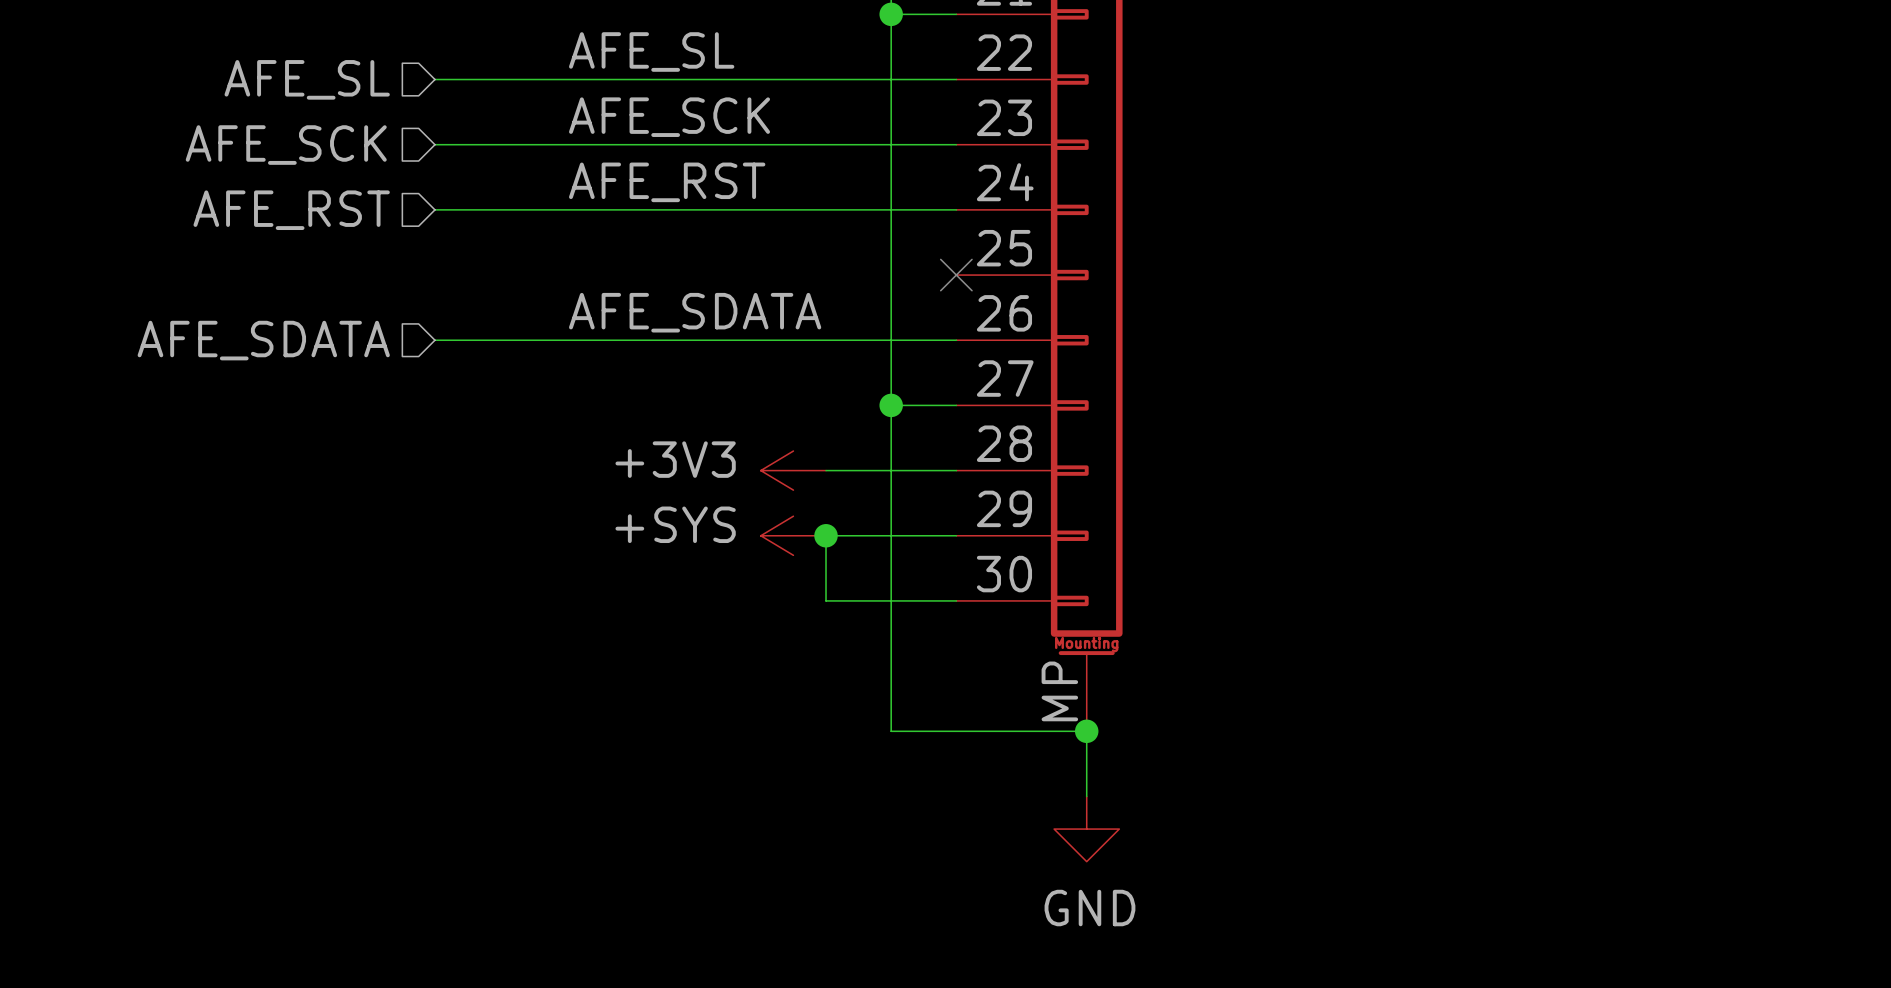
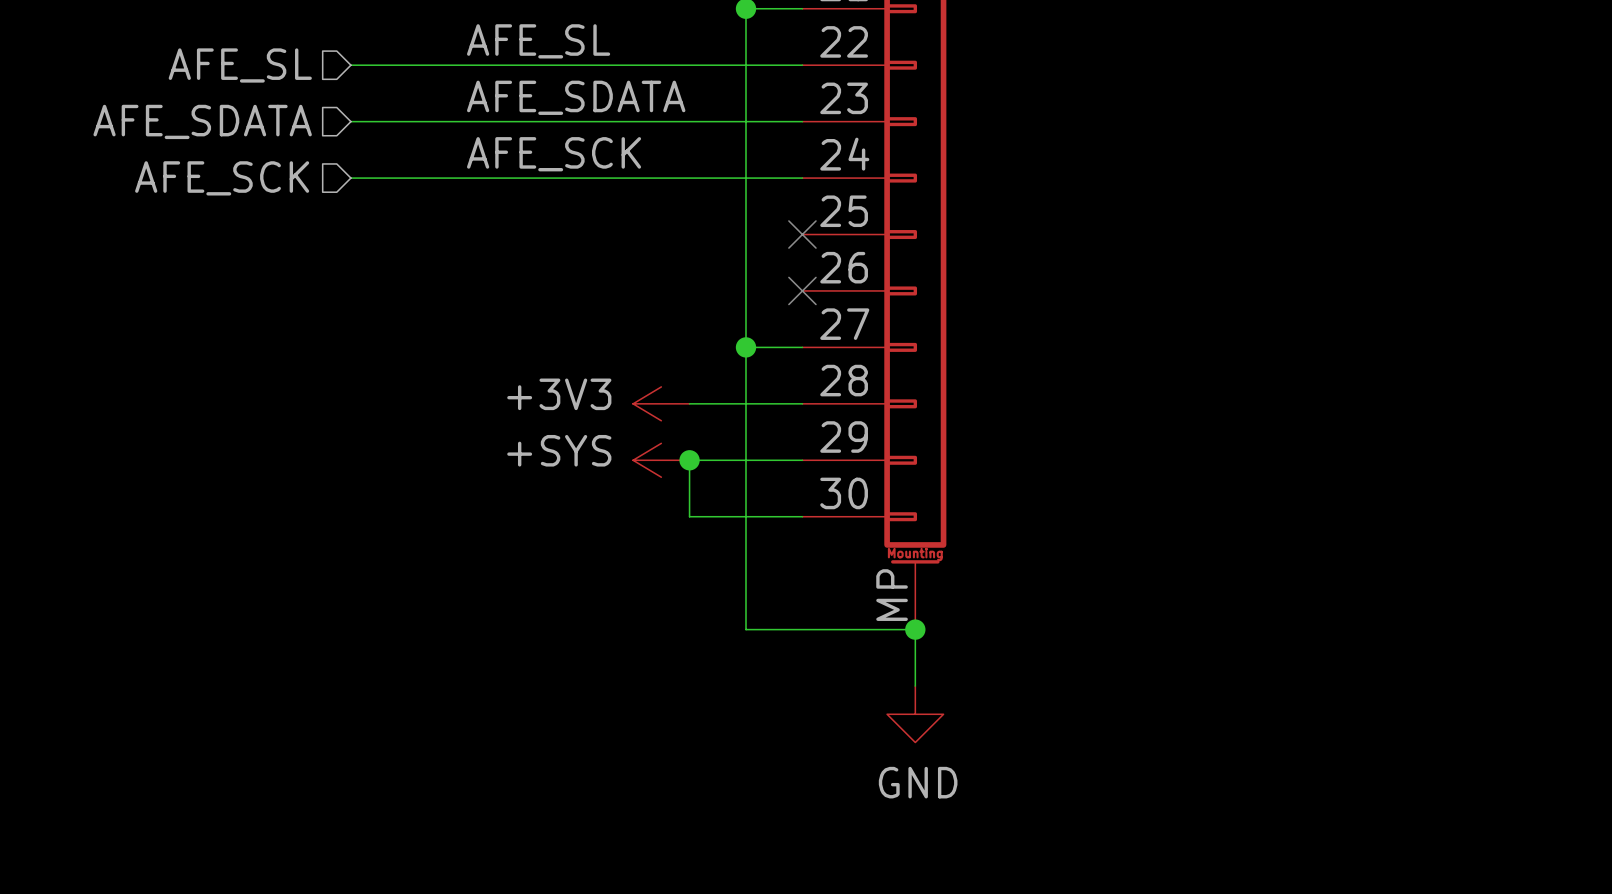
label: AFE_SCK (669, 117) -> AFE_SDATA (576, 97)
hierarchical label: AFE_SCK (286, 145) -> AFE_SDATA (202, 121)
label: AFE_RST (667, 182) -> AFE_SCK (554, 154)
hierarchical label: AFE_RST (291, 210) -> AFE_SCK (222, 178)
label: AFE_SDATA (695, 312) -> none
hierarchical label: AFE_SDATA (263, 340) -> none
wire: (434, 340) (956, 340) -> none
no-connect mark: none -> (802, 290)

